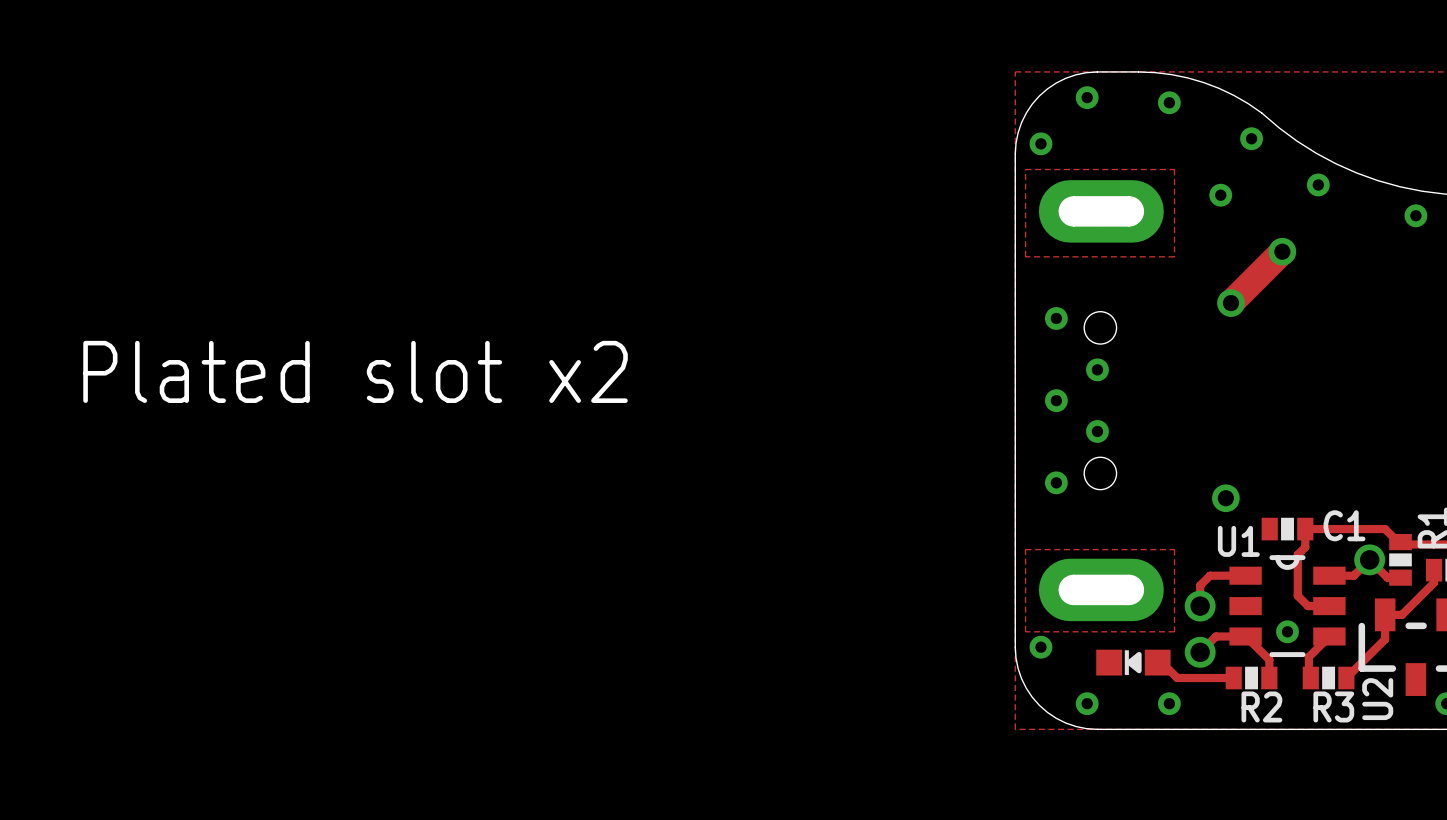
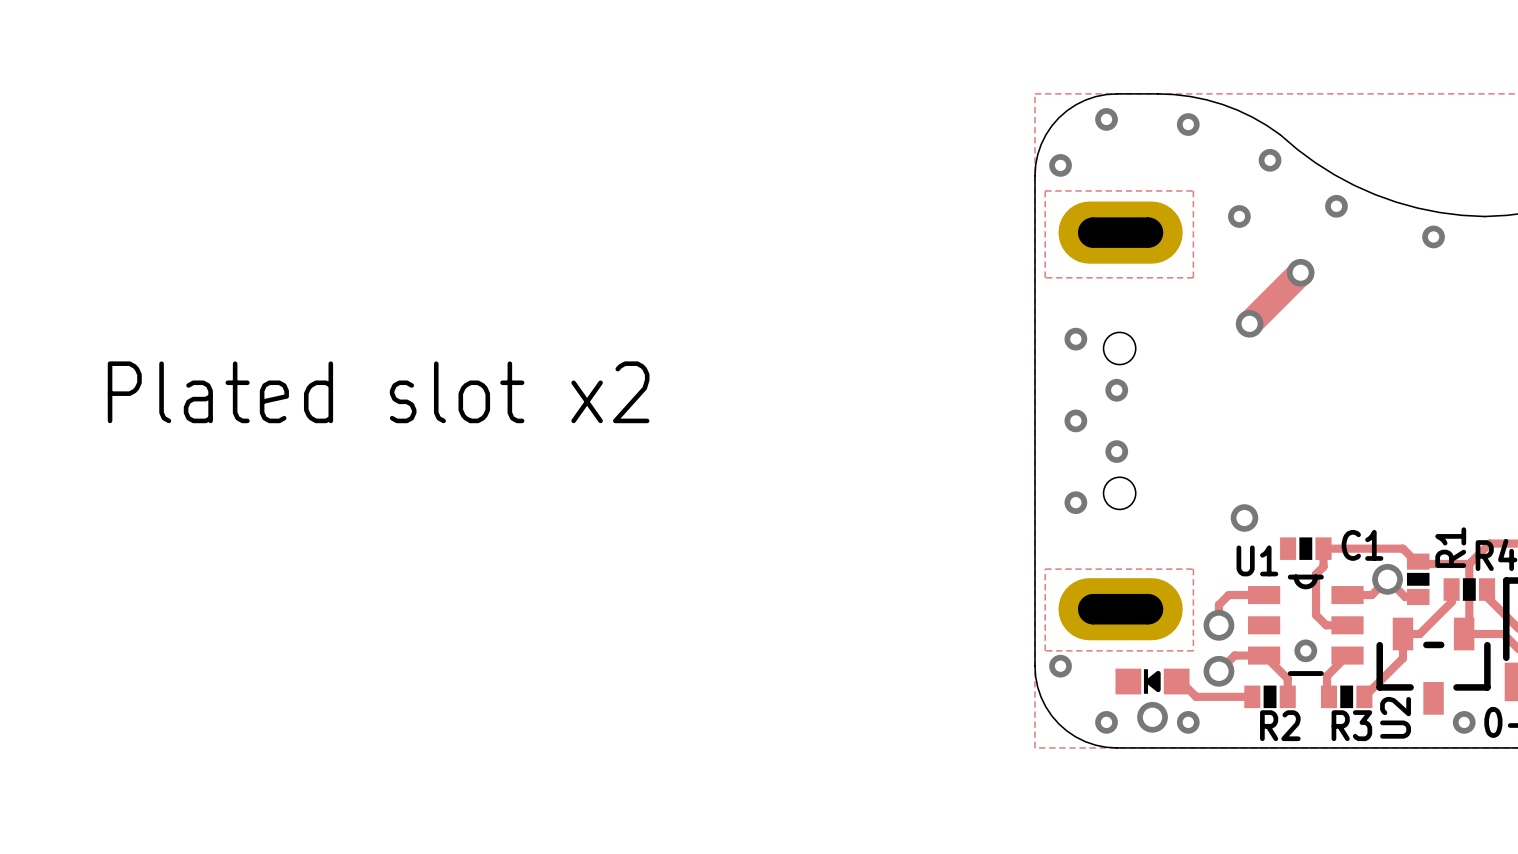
via: none -> (1152, 717)

